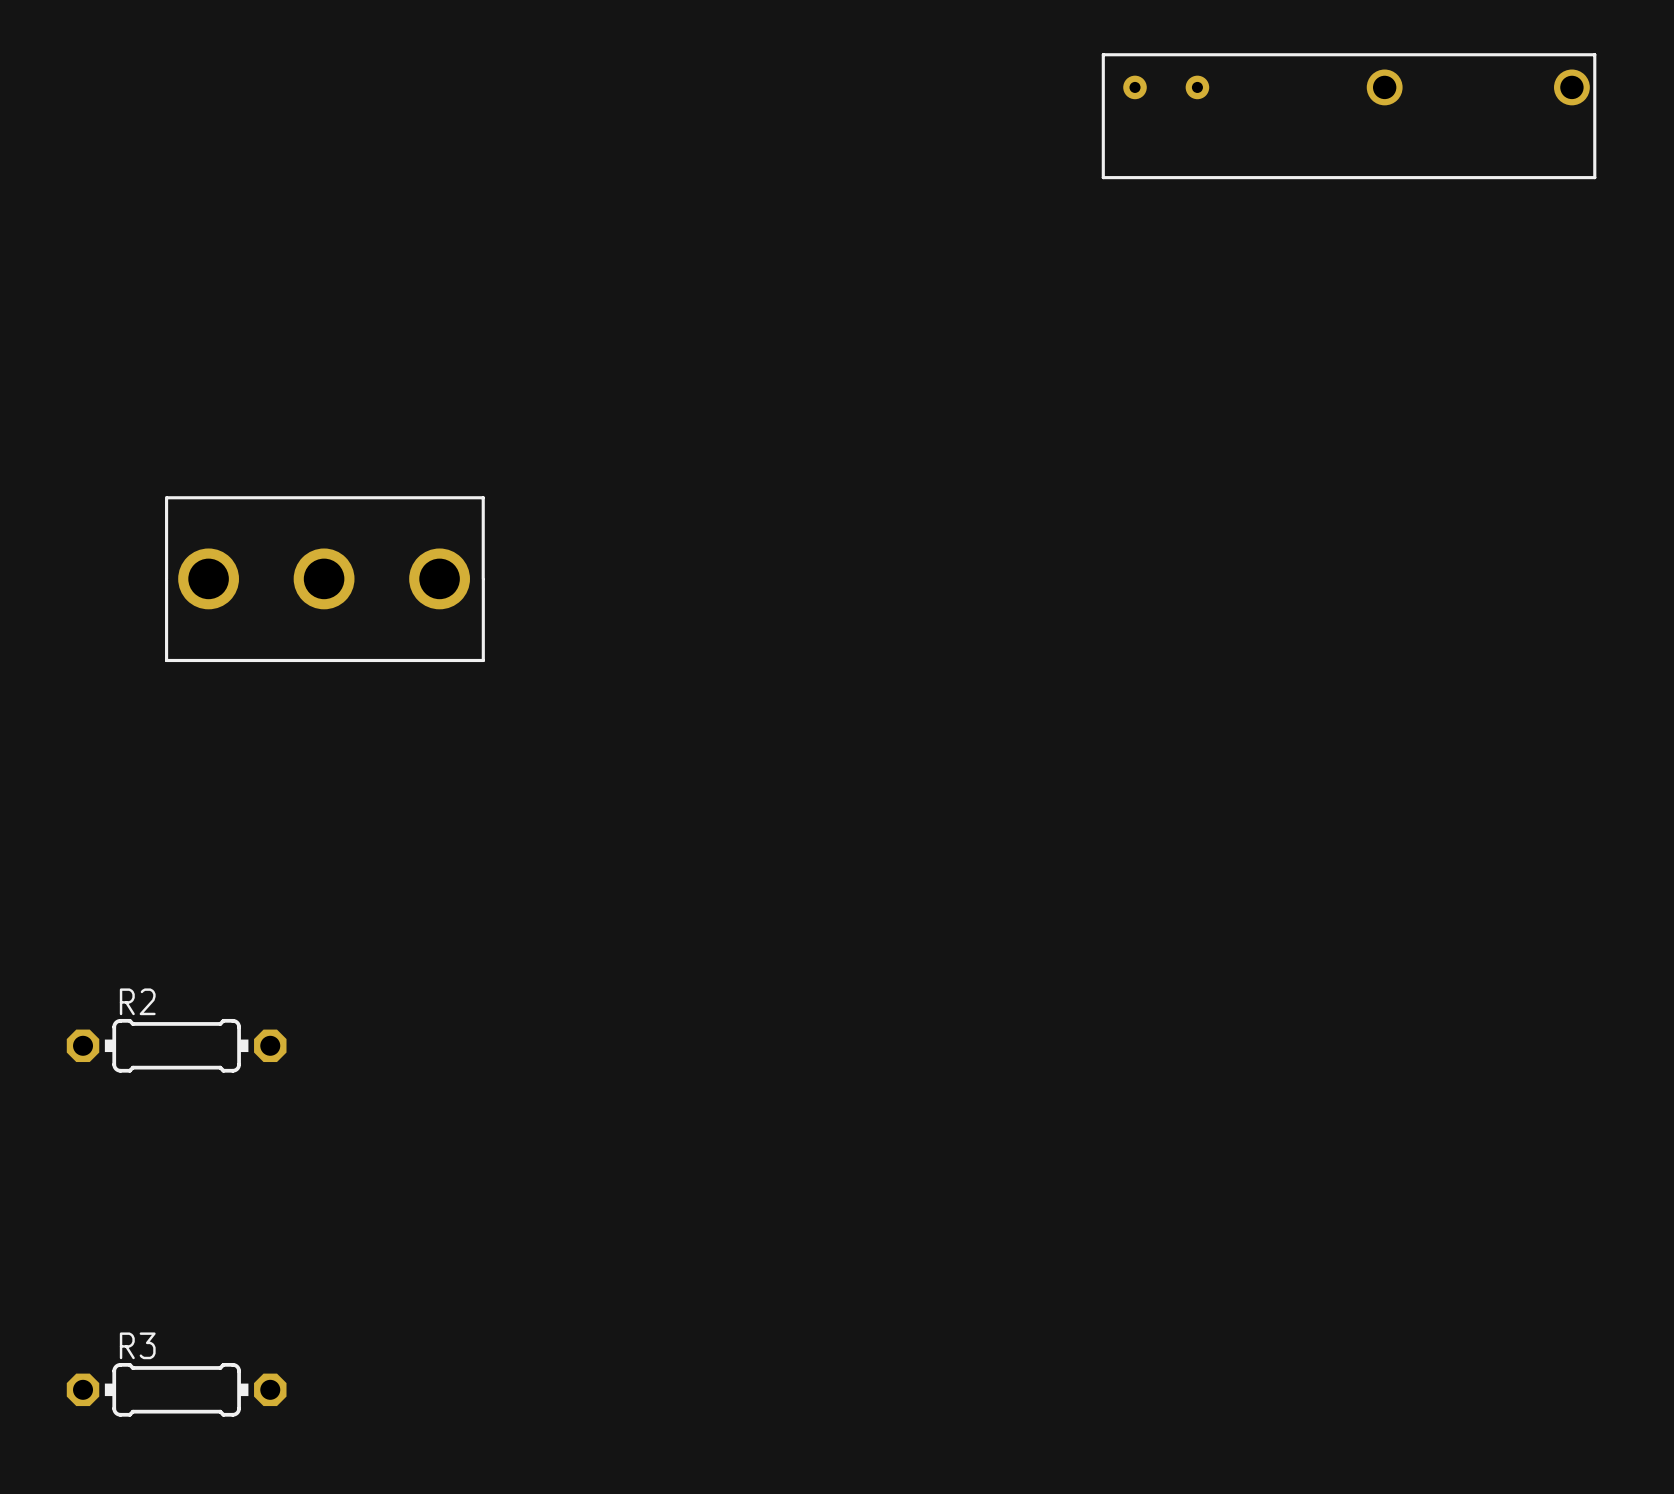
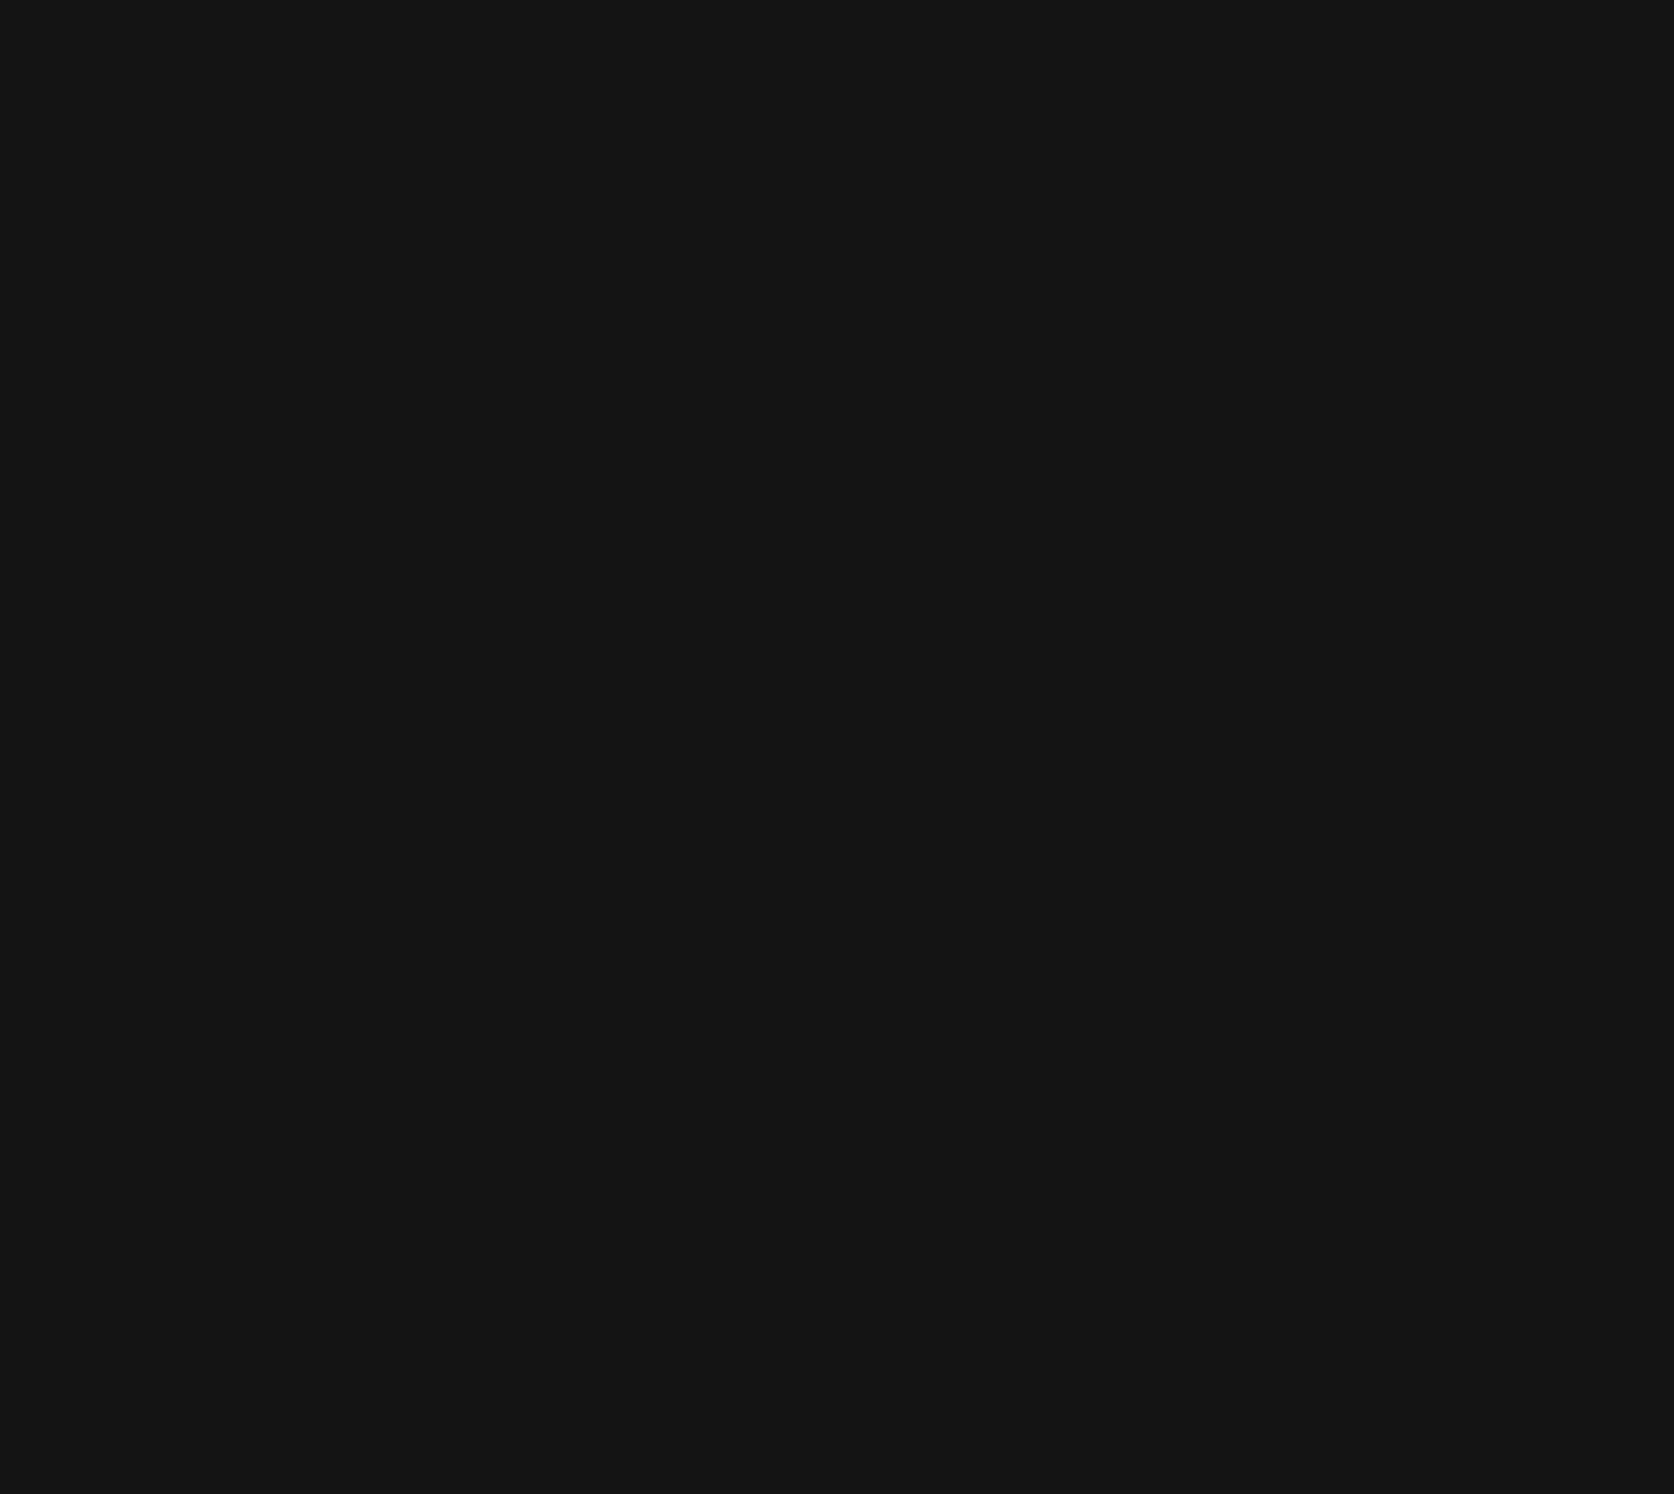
part: (1349, 116) -> none
part: (324, 579) -> none
R2: (176, 1045) -> none
R3: (176, 1389) -> none

